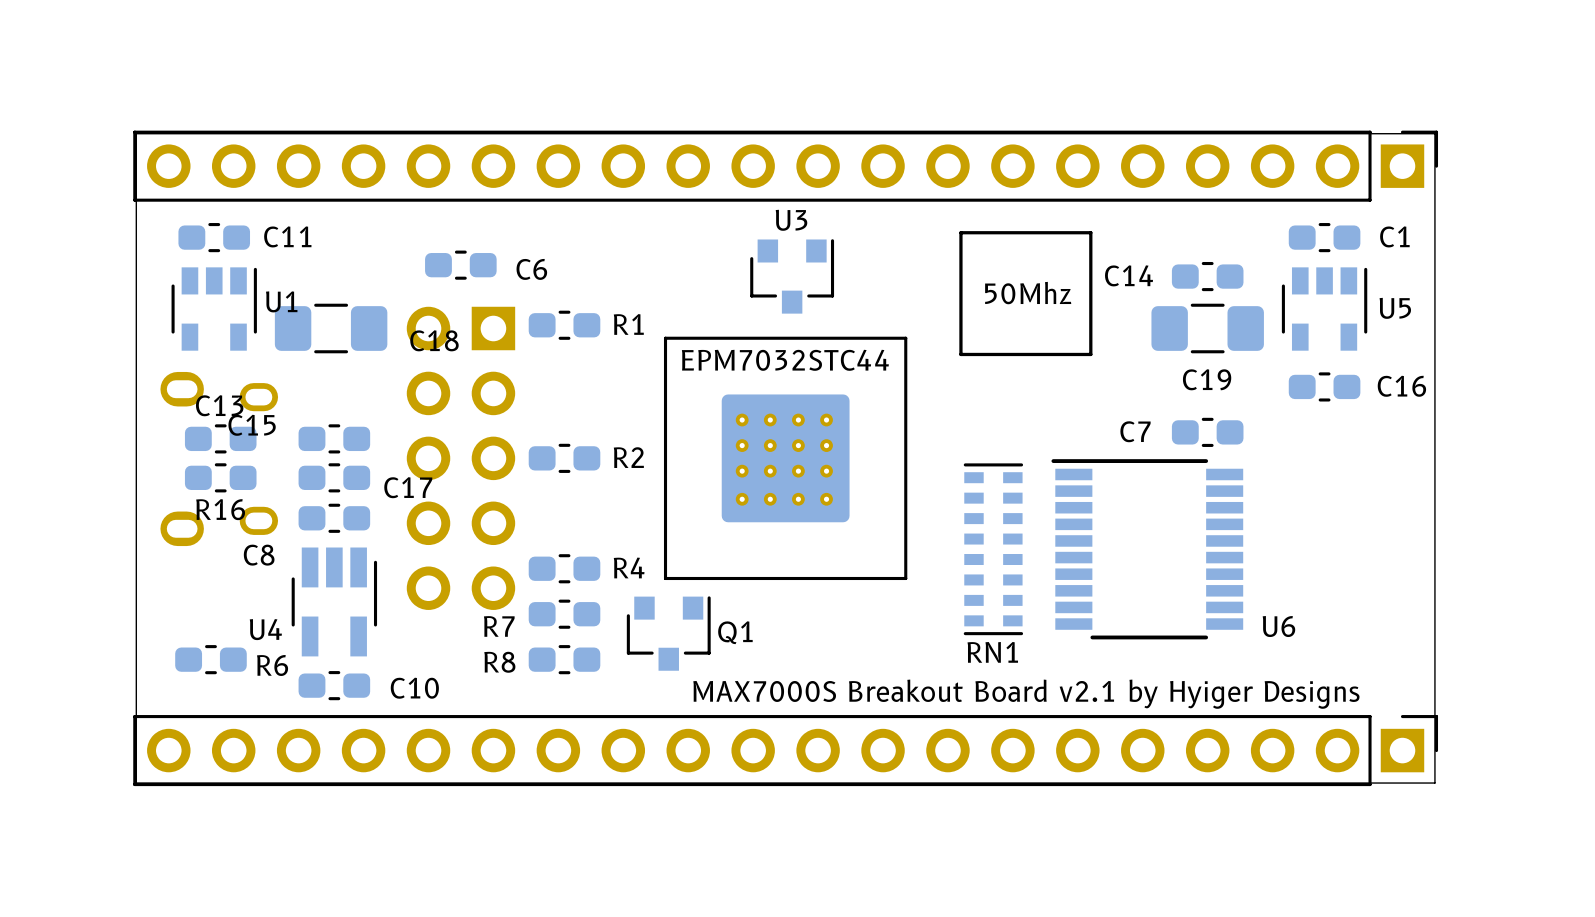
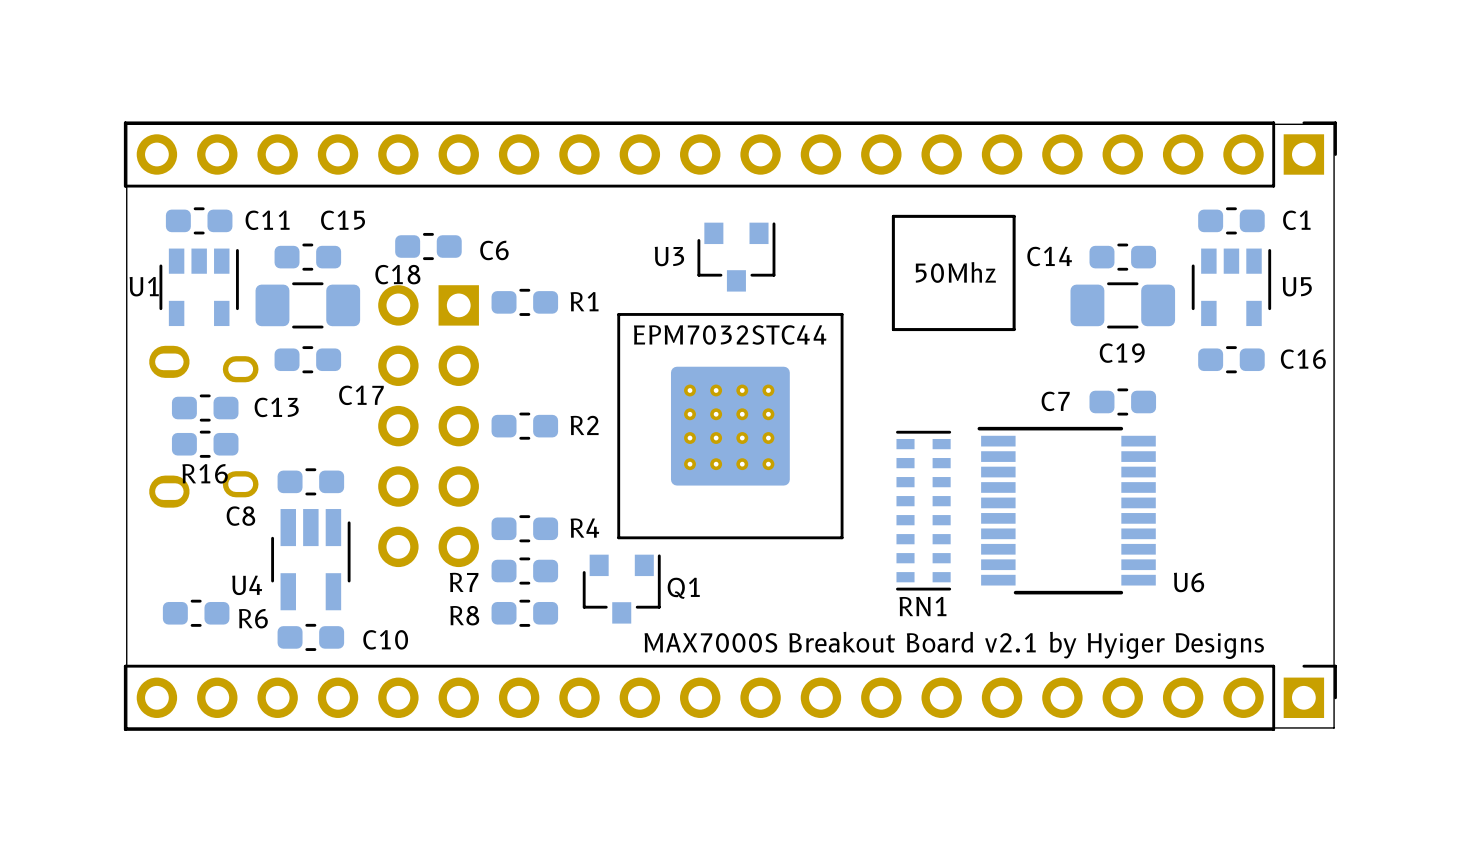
U3 name position: U3 (791, 220) -> U3 (669, 256)
U1 name position: U1 (281, 301) -> U1 (144, 286)
C18 name position: C18 (434, 340) -> C18 (397, 274)
C13 name position: C13 (219, 405) -> C13 (276, 407)
C15 name position: C15 (252, 425) -> C15 (343, 220)
C15 position: (334, 438) -> (307, 257)
C17 position: (334, 477) -> (307, 359)
C17 name position: C17 (408, 487) -> C17 (361, 395)

